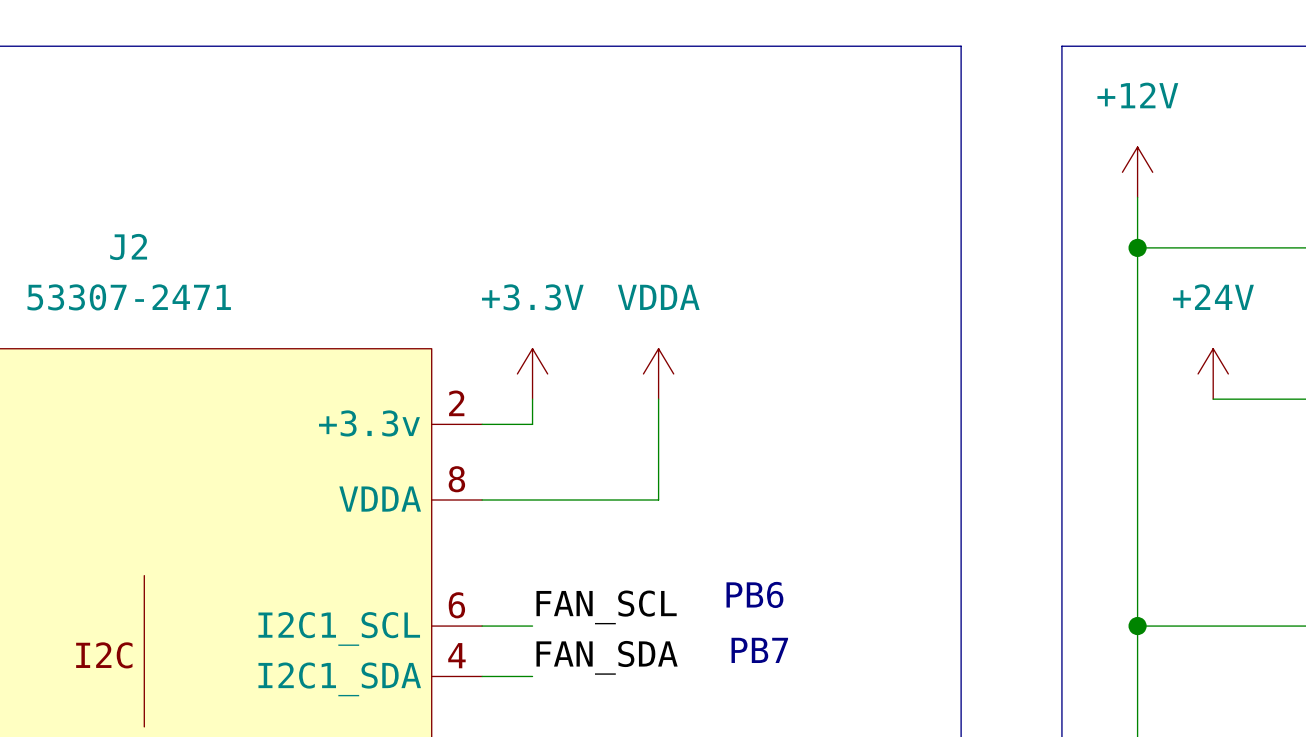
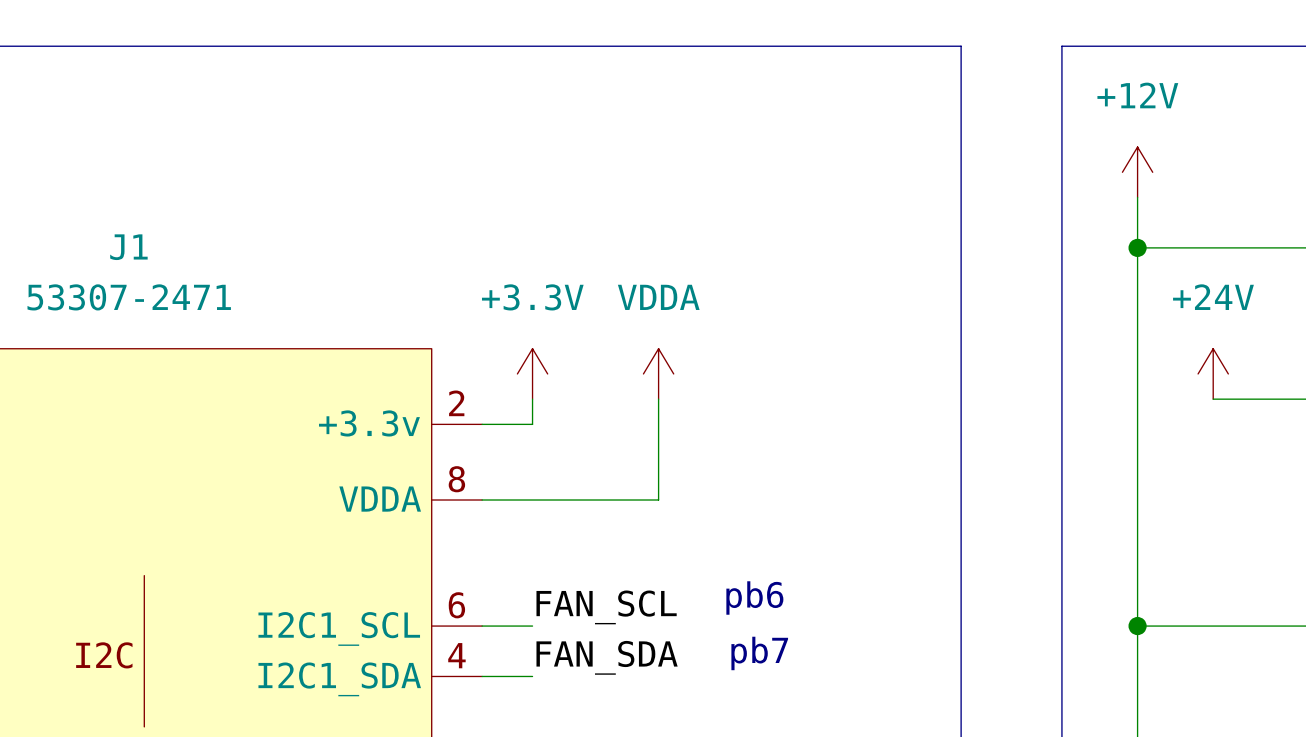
J2 name: J2 (128, 246) -> J1 (128, 247)
text: PB6 (754, 594) -> pb6 (754, 598)
text: PB7 (759, 650) -> pb7 (759, 653)

